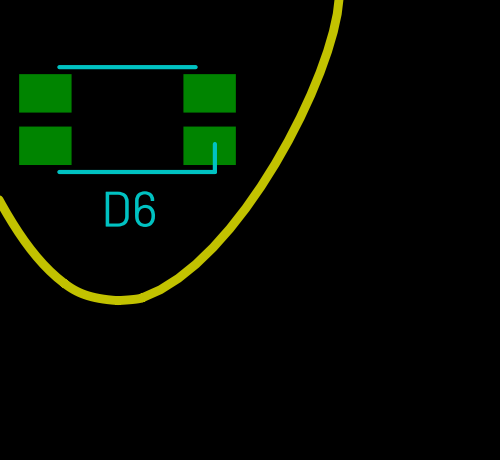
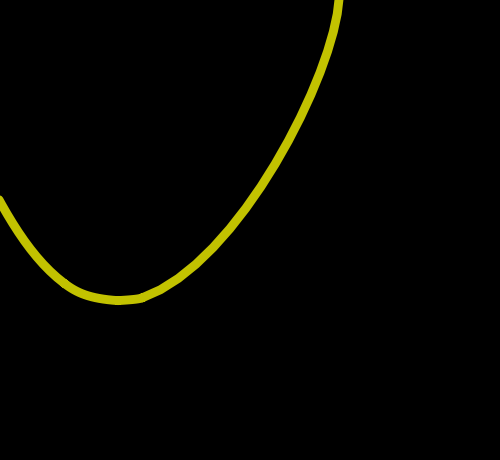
D6: (127, 119) -> none

